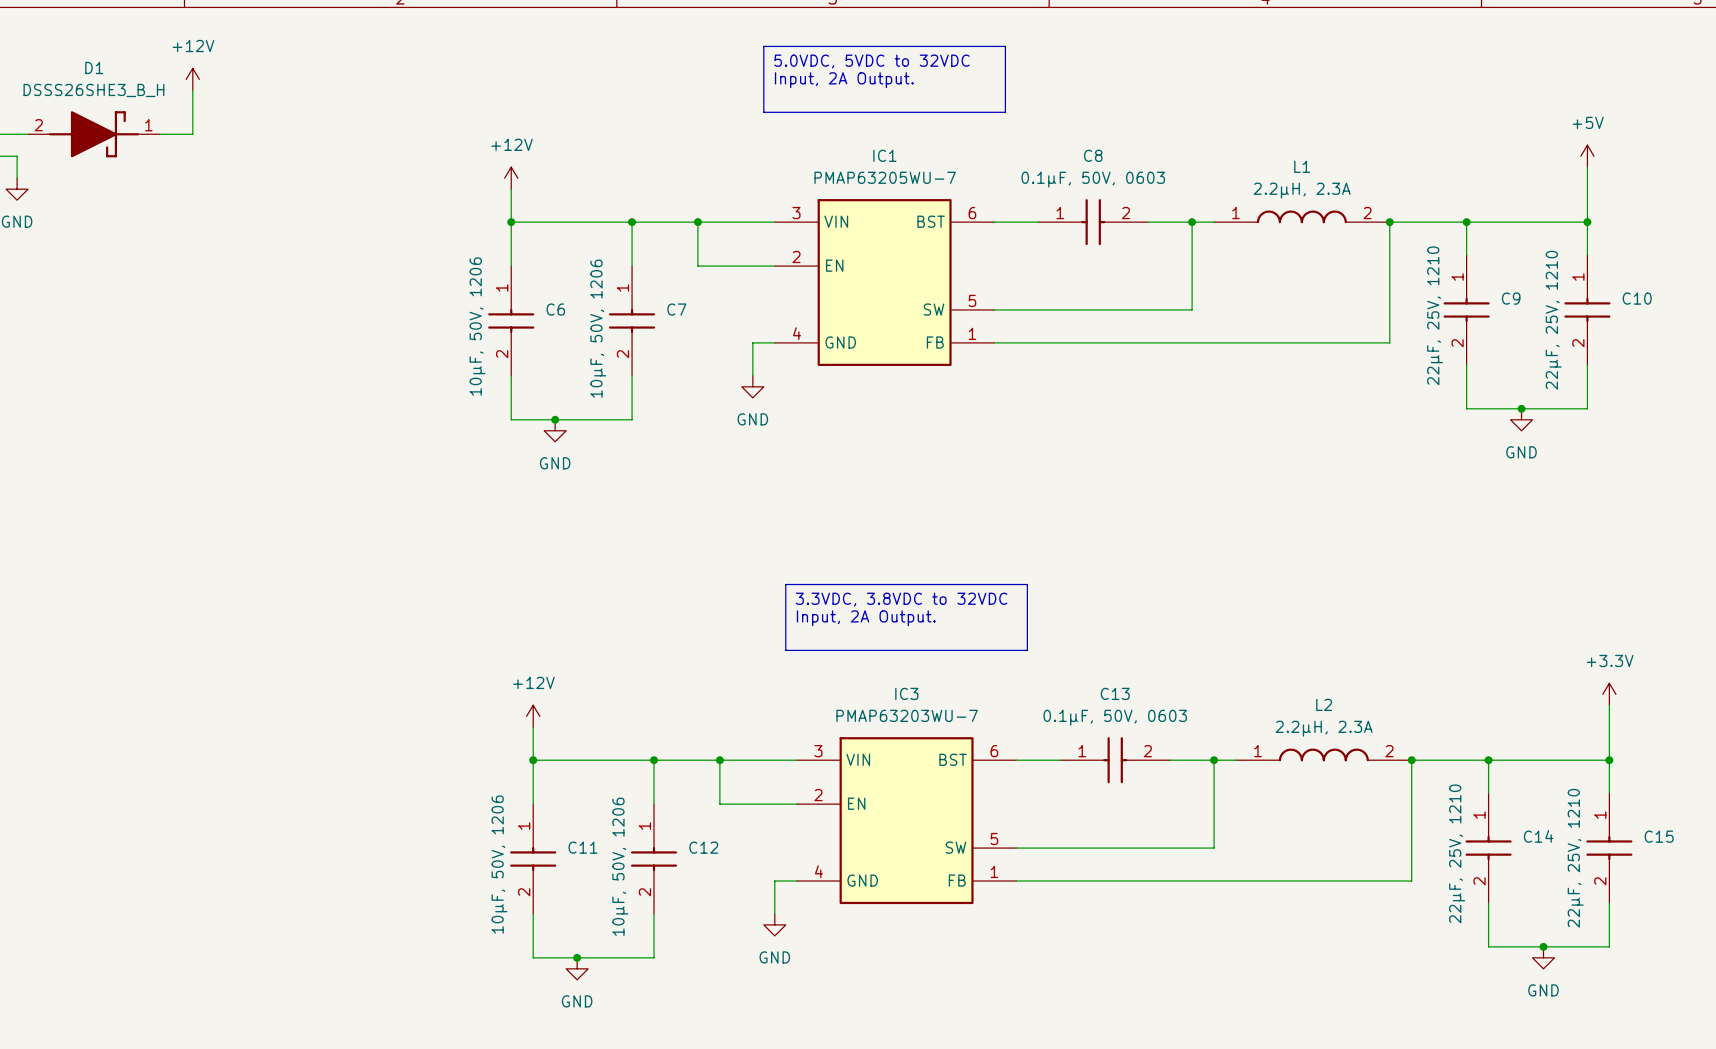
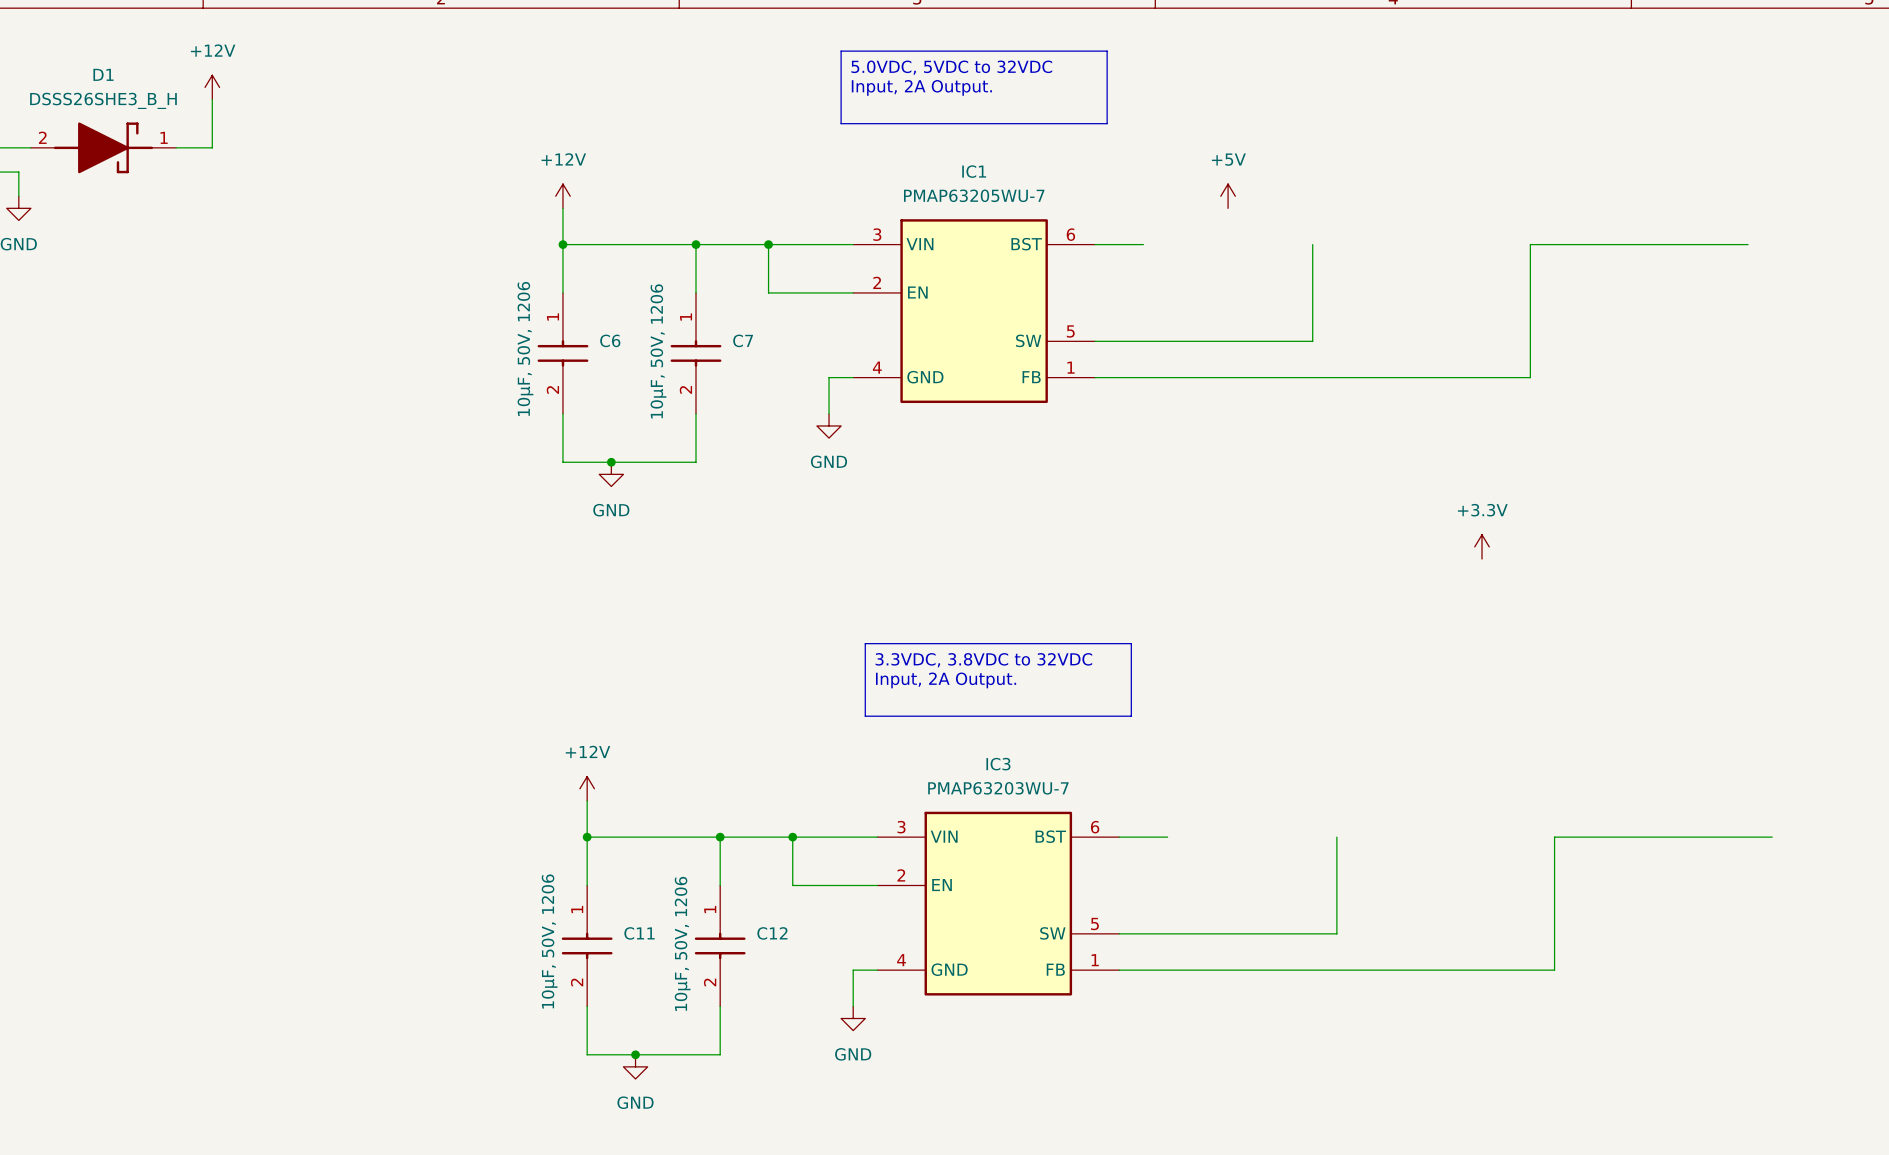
power symbol: +5V (1587, 156) -> none
wire: (1587, 167) (1587, 255) -> none
power symbol: none -> +5V (1228, 196)
L1: (1301, 216) -> none
C8: (1093, 222) -> none
wire: (1148, 222) (1214, 222) -> none
junction: (1192, 222) -> none
junction: (1389, 222) -> none
wire: (1466, 222) (1466, 255) -> none
junction: (1466, 222) -> none
junction: (1587, 222) -> none
C9: (1466, 309) -> none
C10: (1587, 309) -> none
wire: (1466, 364) (1466, 408) (1587, 408) (1587, 364) -> none
junction: (1521, 408) -> none
power symbol: GND (1521, 419) -> none
power symbol: none -> +3.3V (1482, 546)
power symbol: +3.3V (1609, 694) -> none
wire: (1609, 705) (1609, 793) -> none
L2: (1323, 754) -> none
C13: (1115, 760) -> none
wire: (1170, 760) (1236, 760) -> none
junction: (1214, 760) -> none
junction: (1411, 760) -> none
wire: (1488, 760) (1488, 793) -> none
junction: (1488, 760) -> none
junction: (1609, 760) -> none
C14: (1488, 848) -> none
C15: (1609, 848) -> none
wire: (1488, 902) (1488, 946) (1609, 946) (1609, 902) -> none
junction: (1543, 946) -> none
power symbol: GND (1543, 957) -> none

